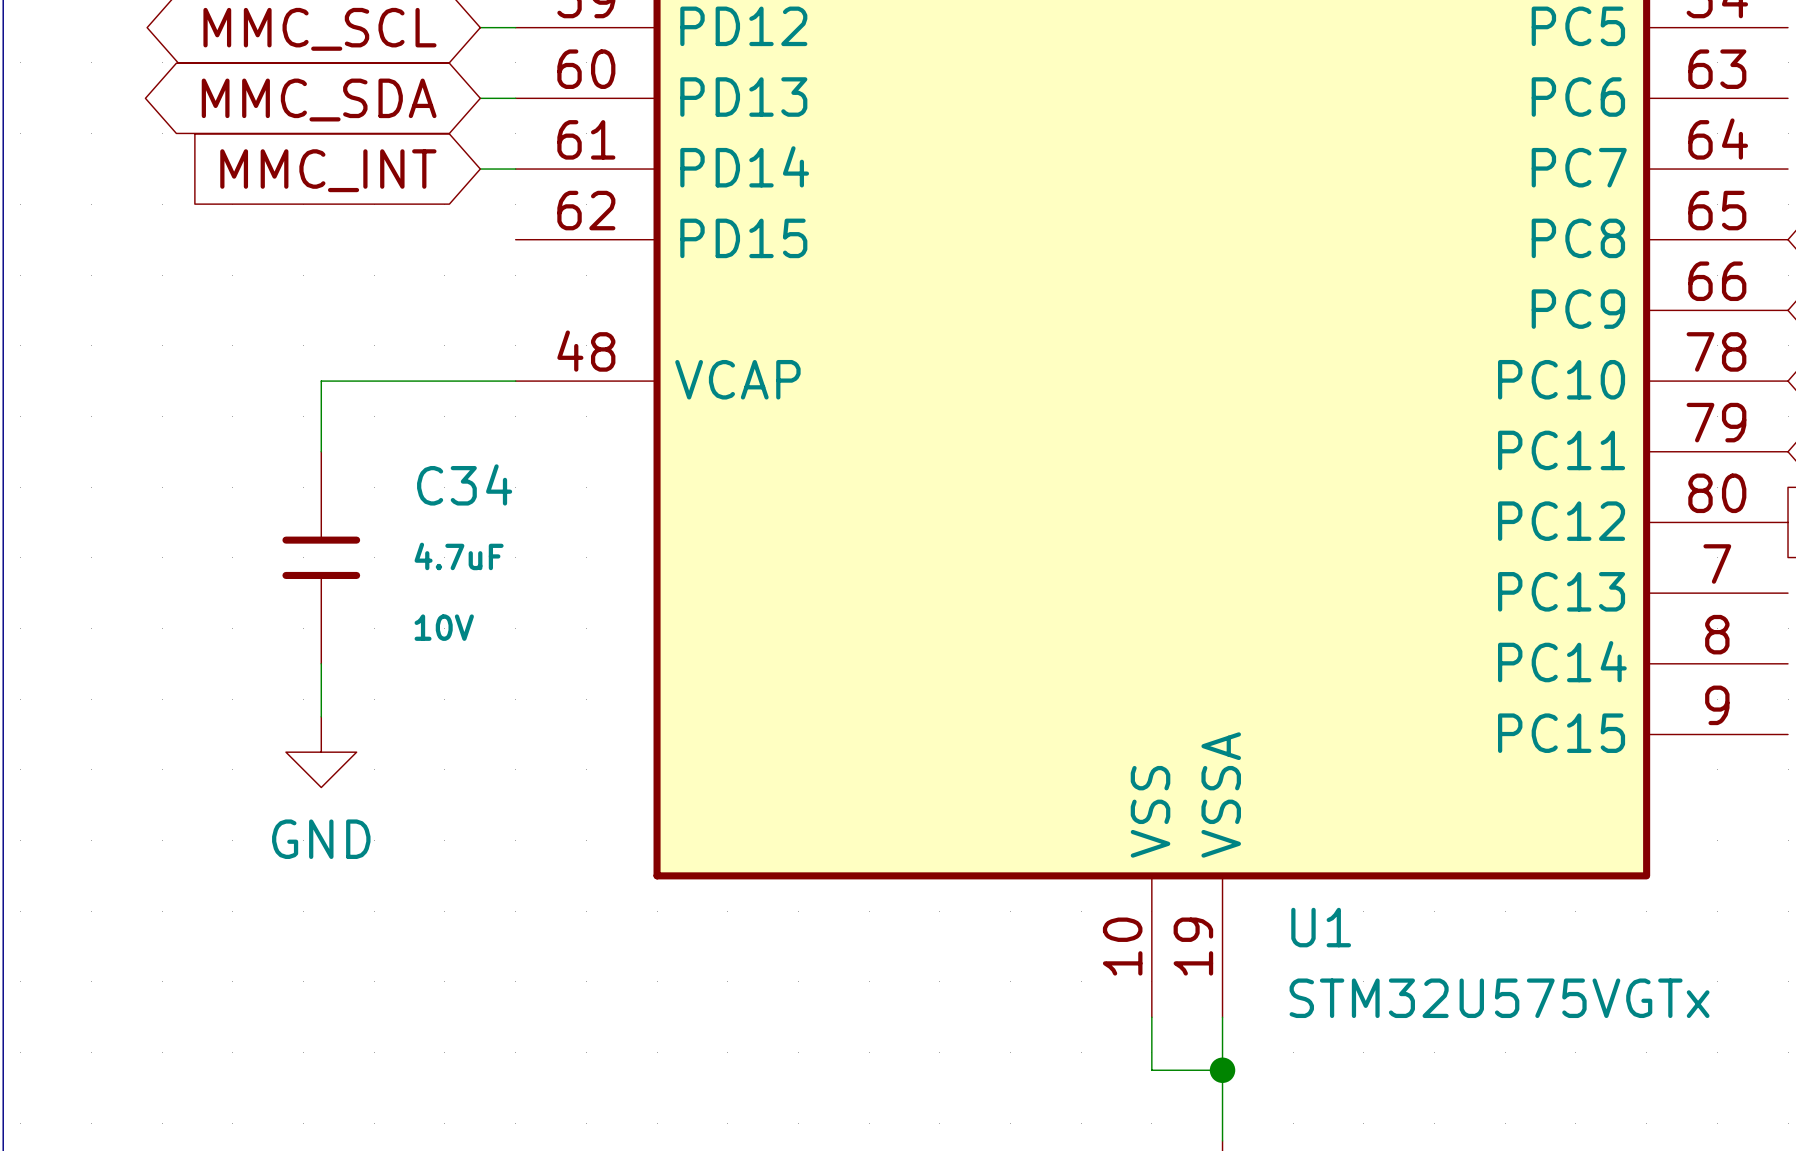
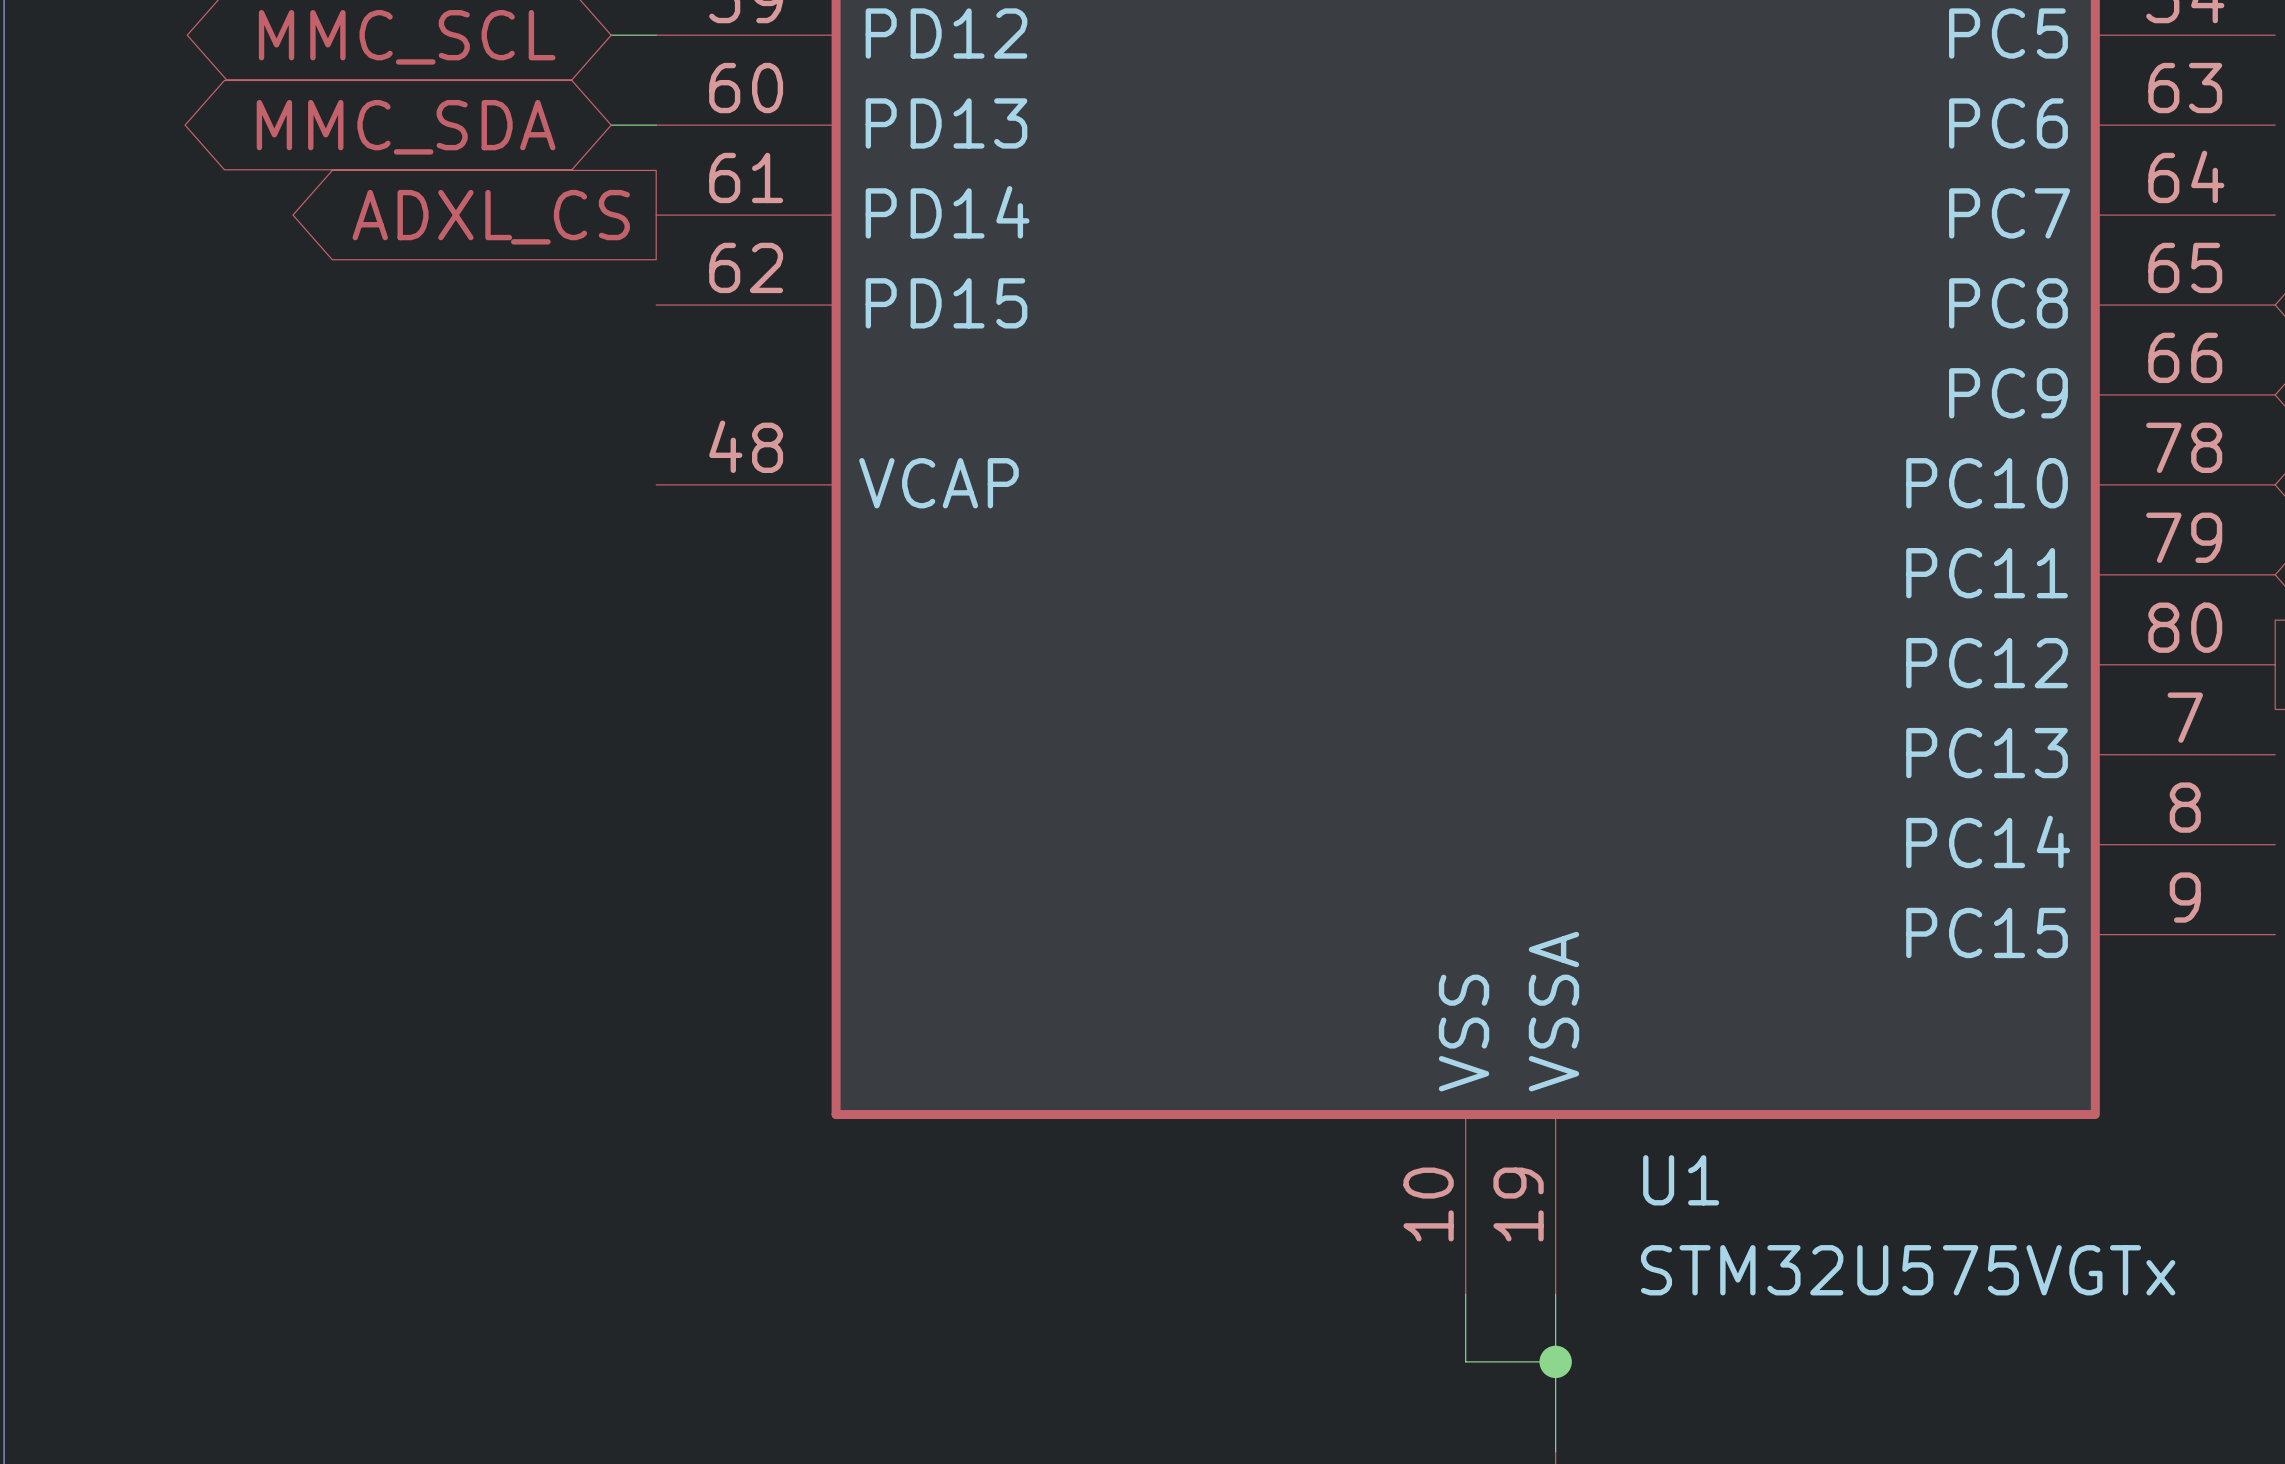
wire: (480, 169) (515, 169) -> none
global label: MMC_INT (328, 170) -> none
global label: none -> ADXL_CS (491, 217)
wire: (515, 381) (321, 381) (321, 451) -> none
C34: 4.7uF (321, 557) -> none
wire: (321, 663) (321, 716) -> none
power symbol: GND (321, 752) -> none

